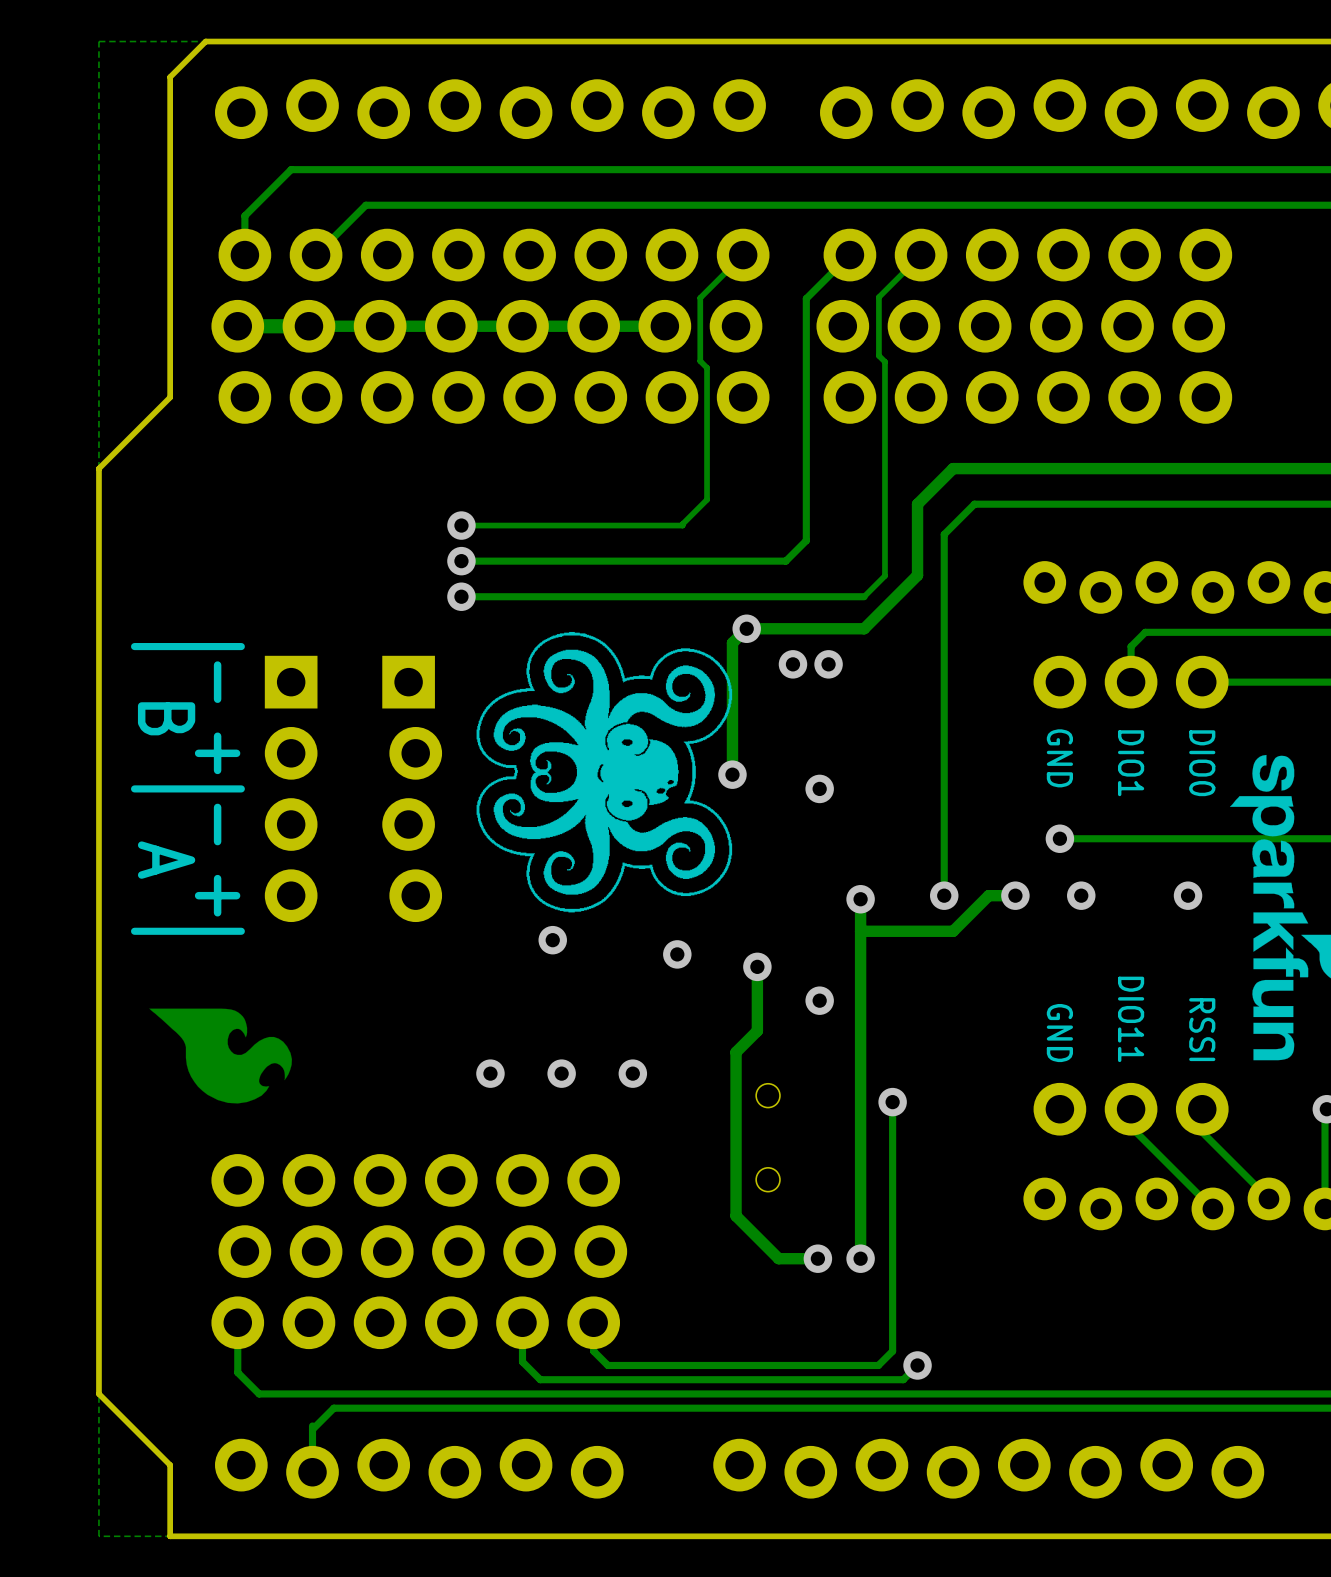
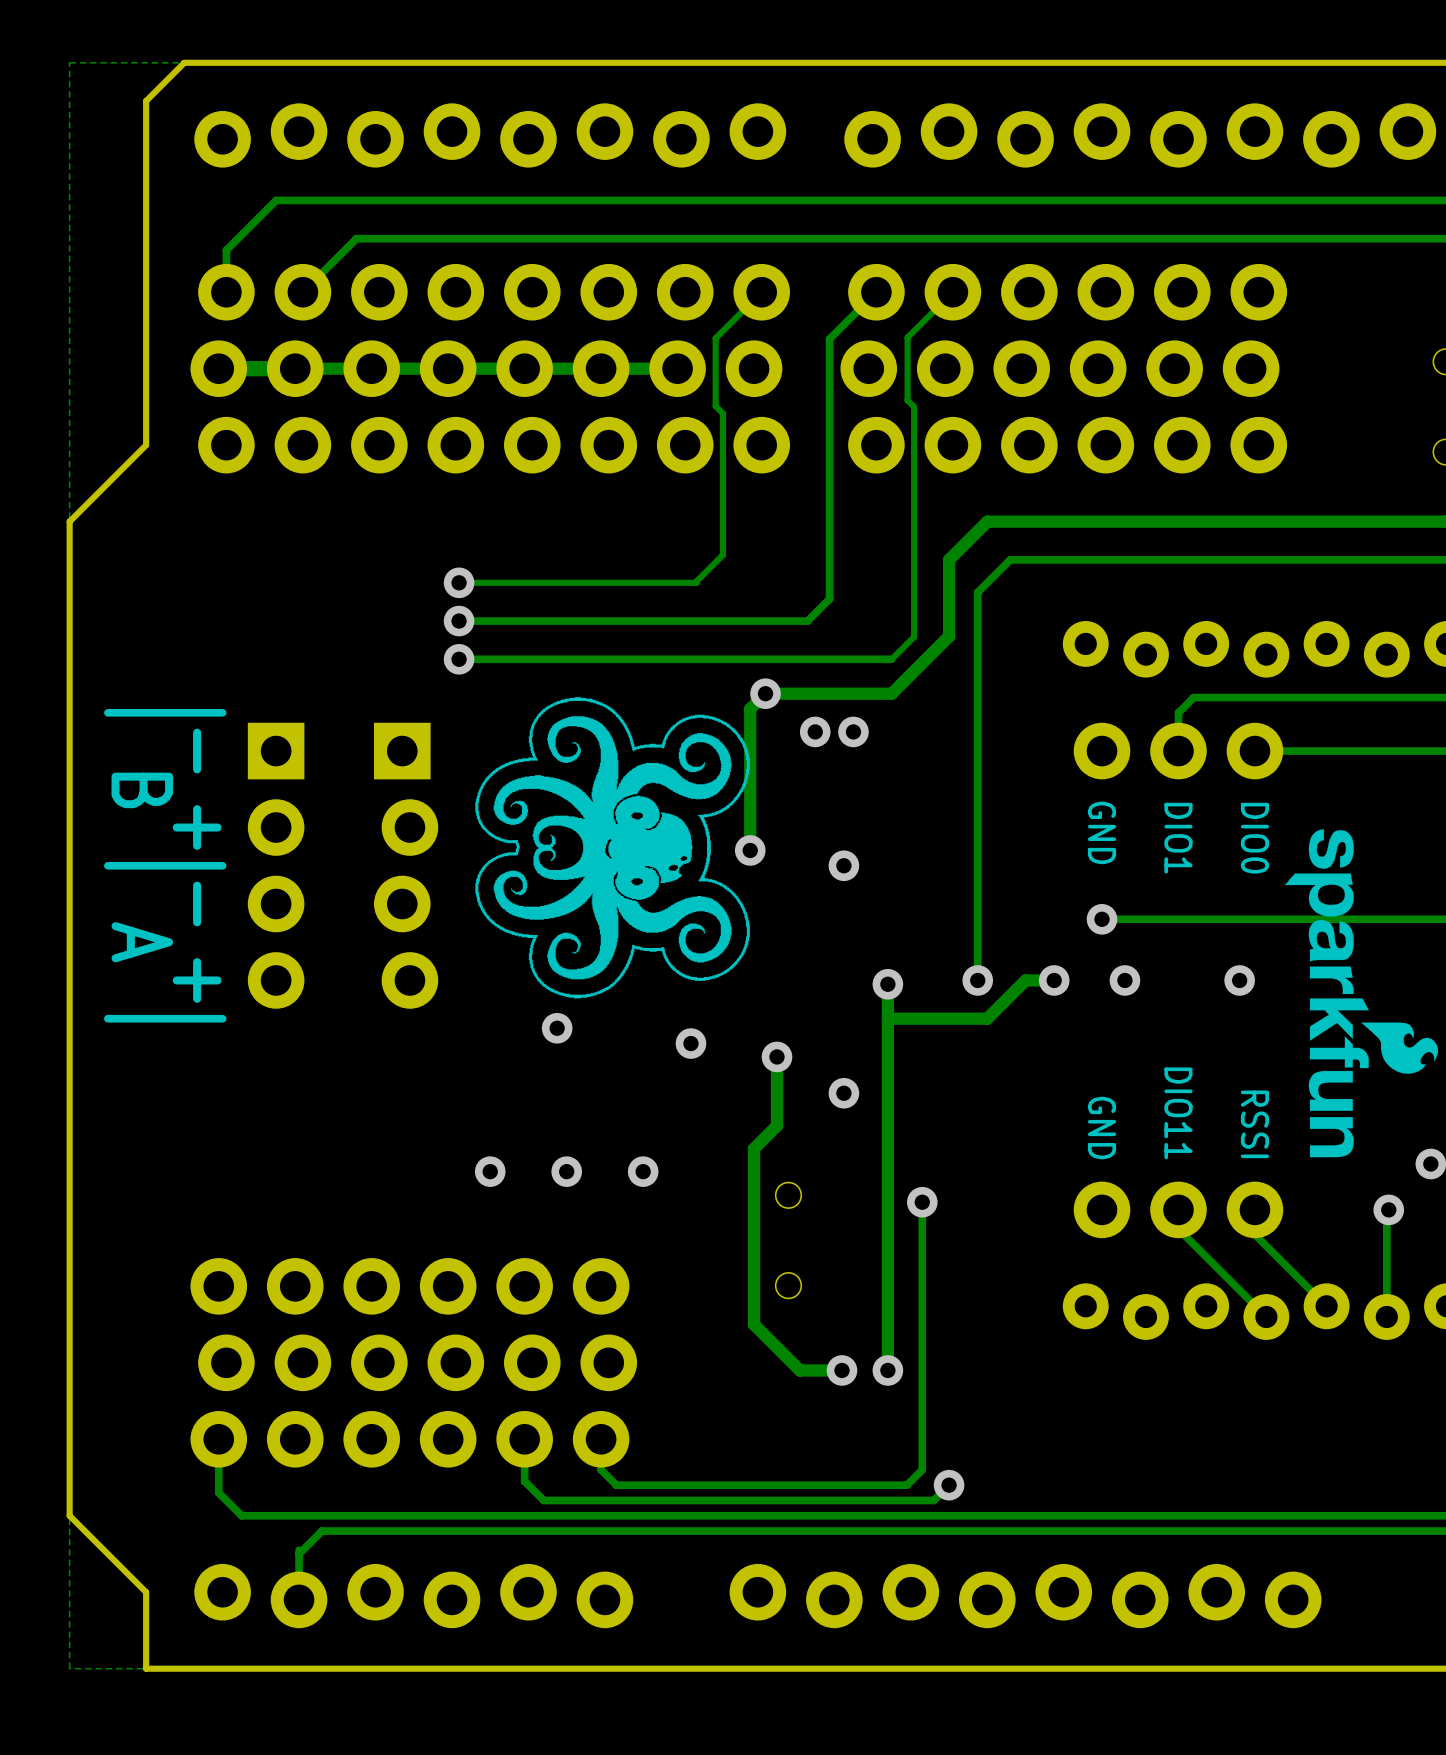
drawing: [149, 1008, 292, 1104] -> none

